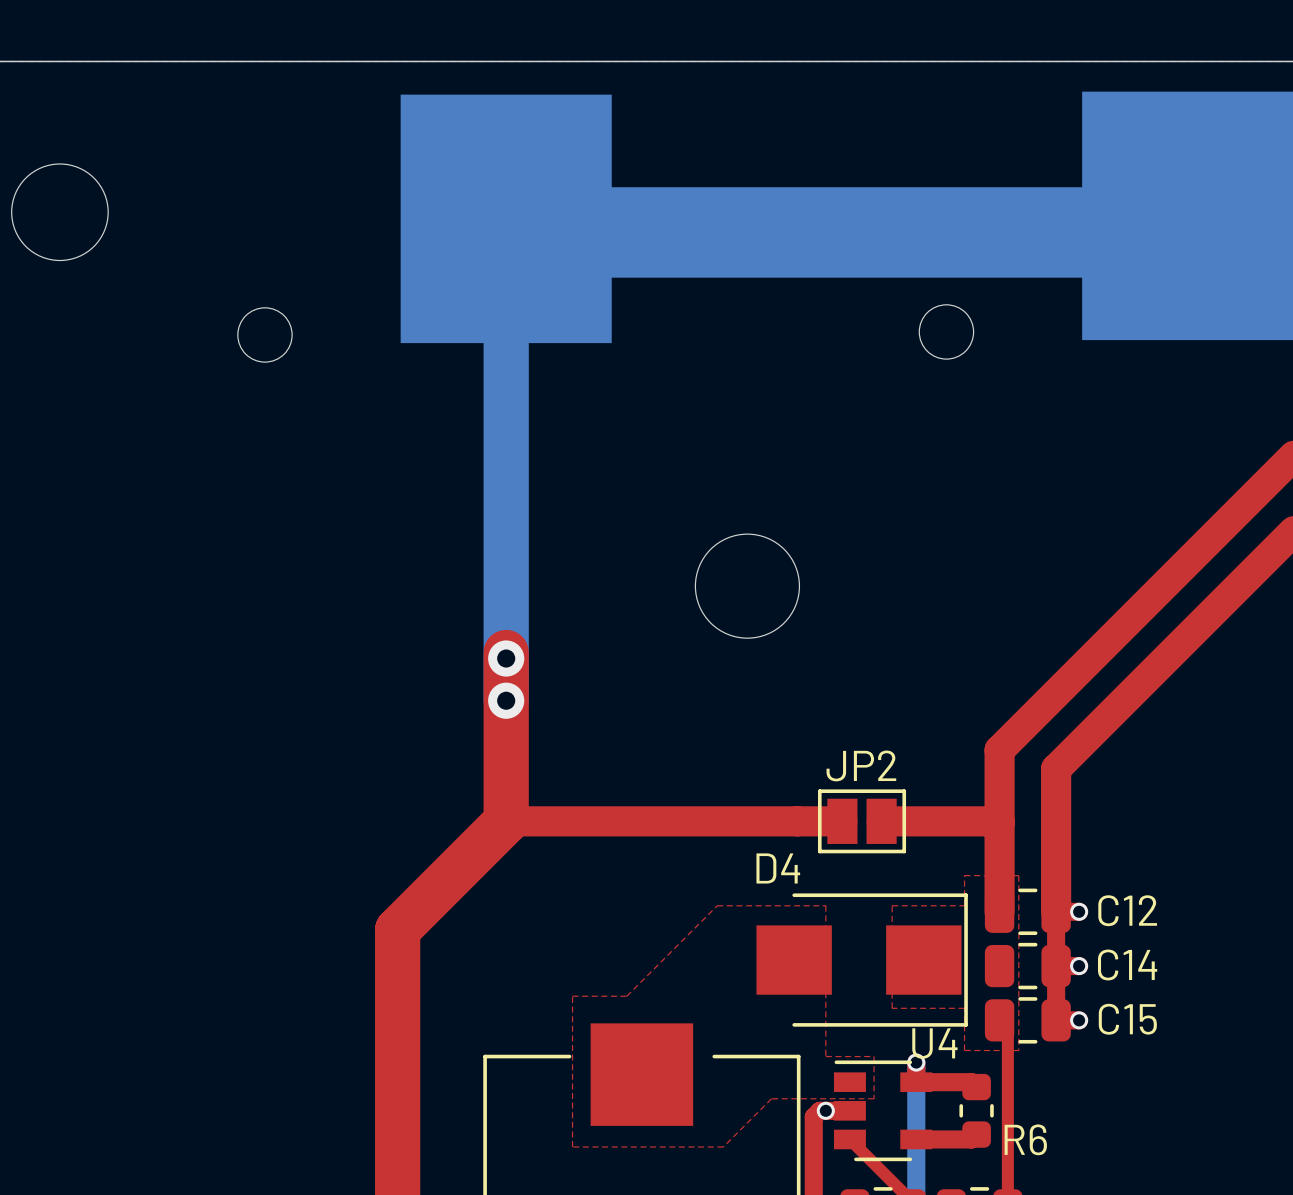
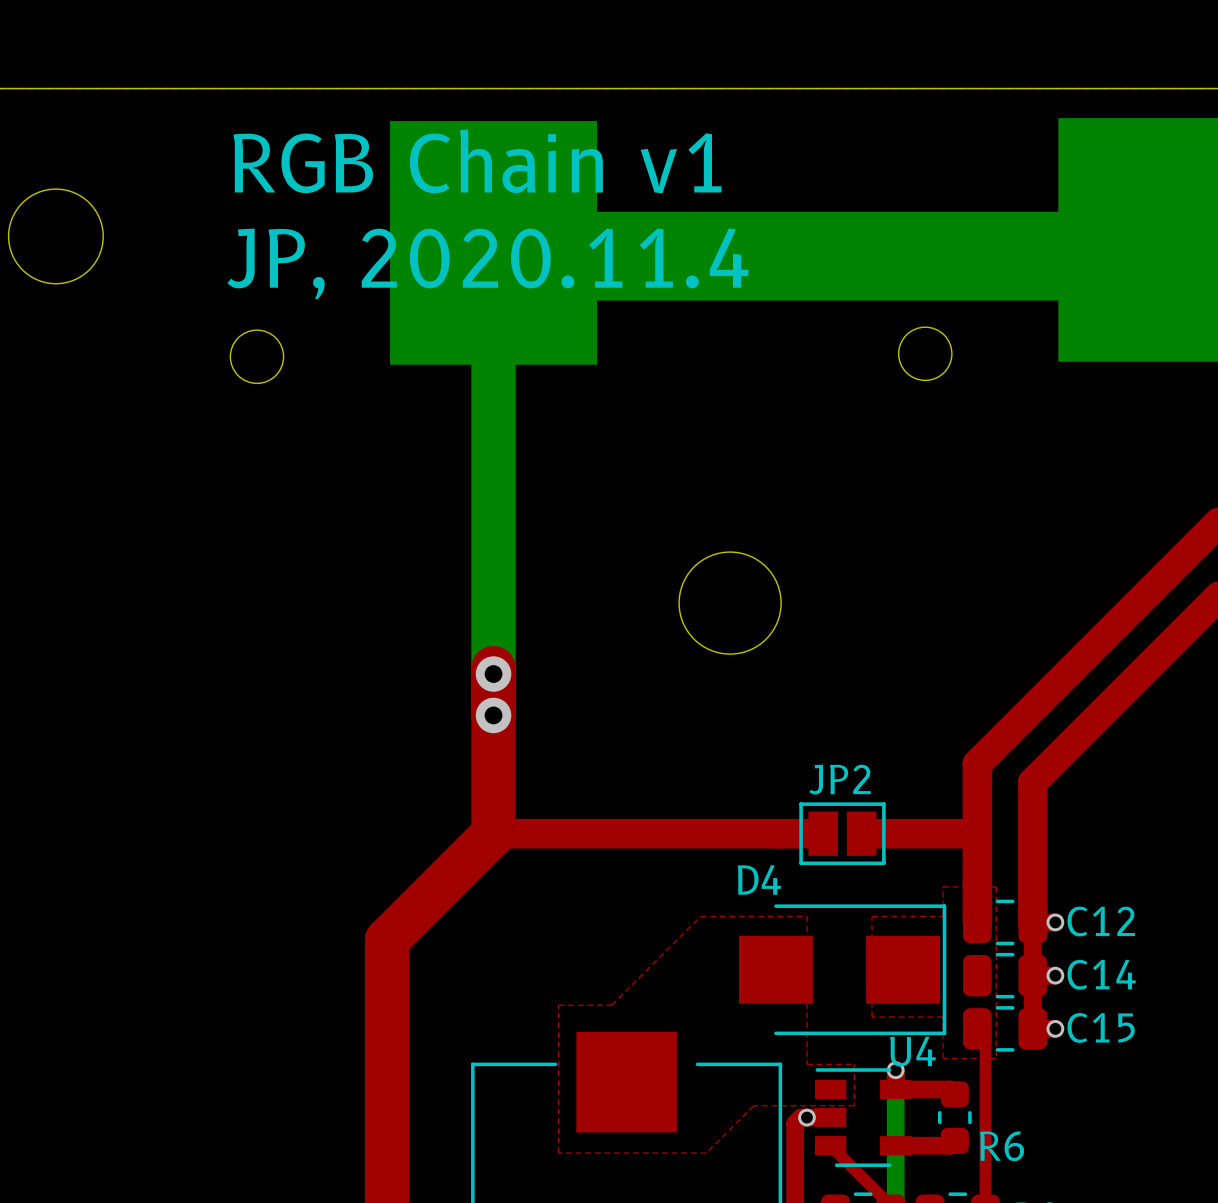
text: none -> RGB Chain v1 (477, 161)
text: none -> JP, 2020.11.4 (488, 264)

